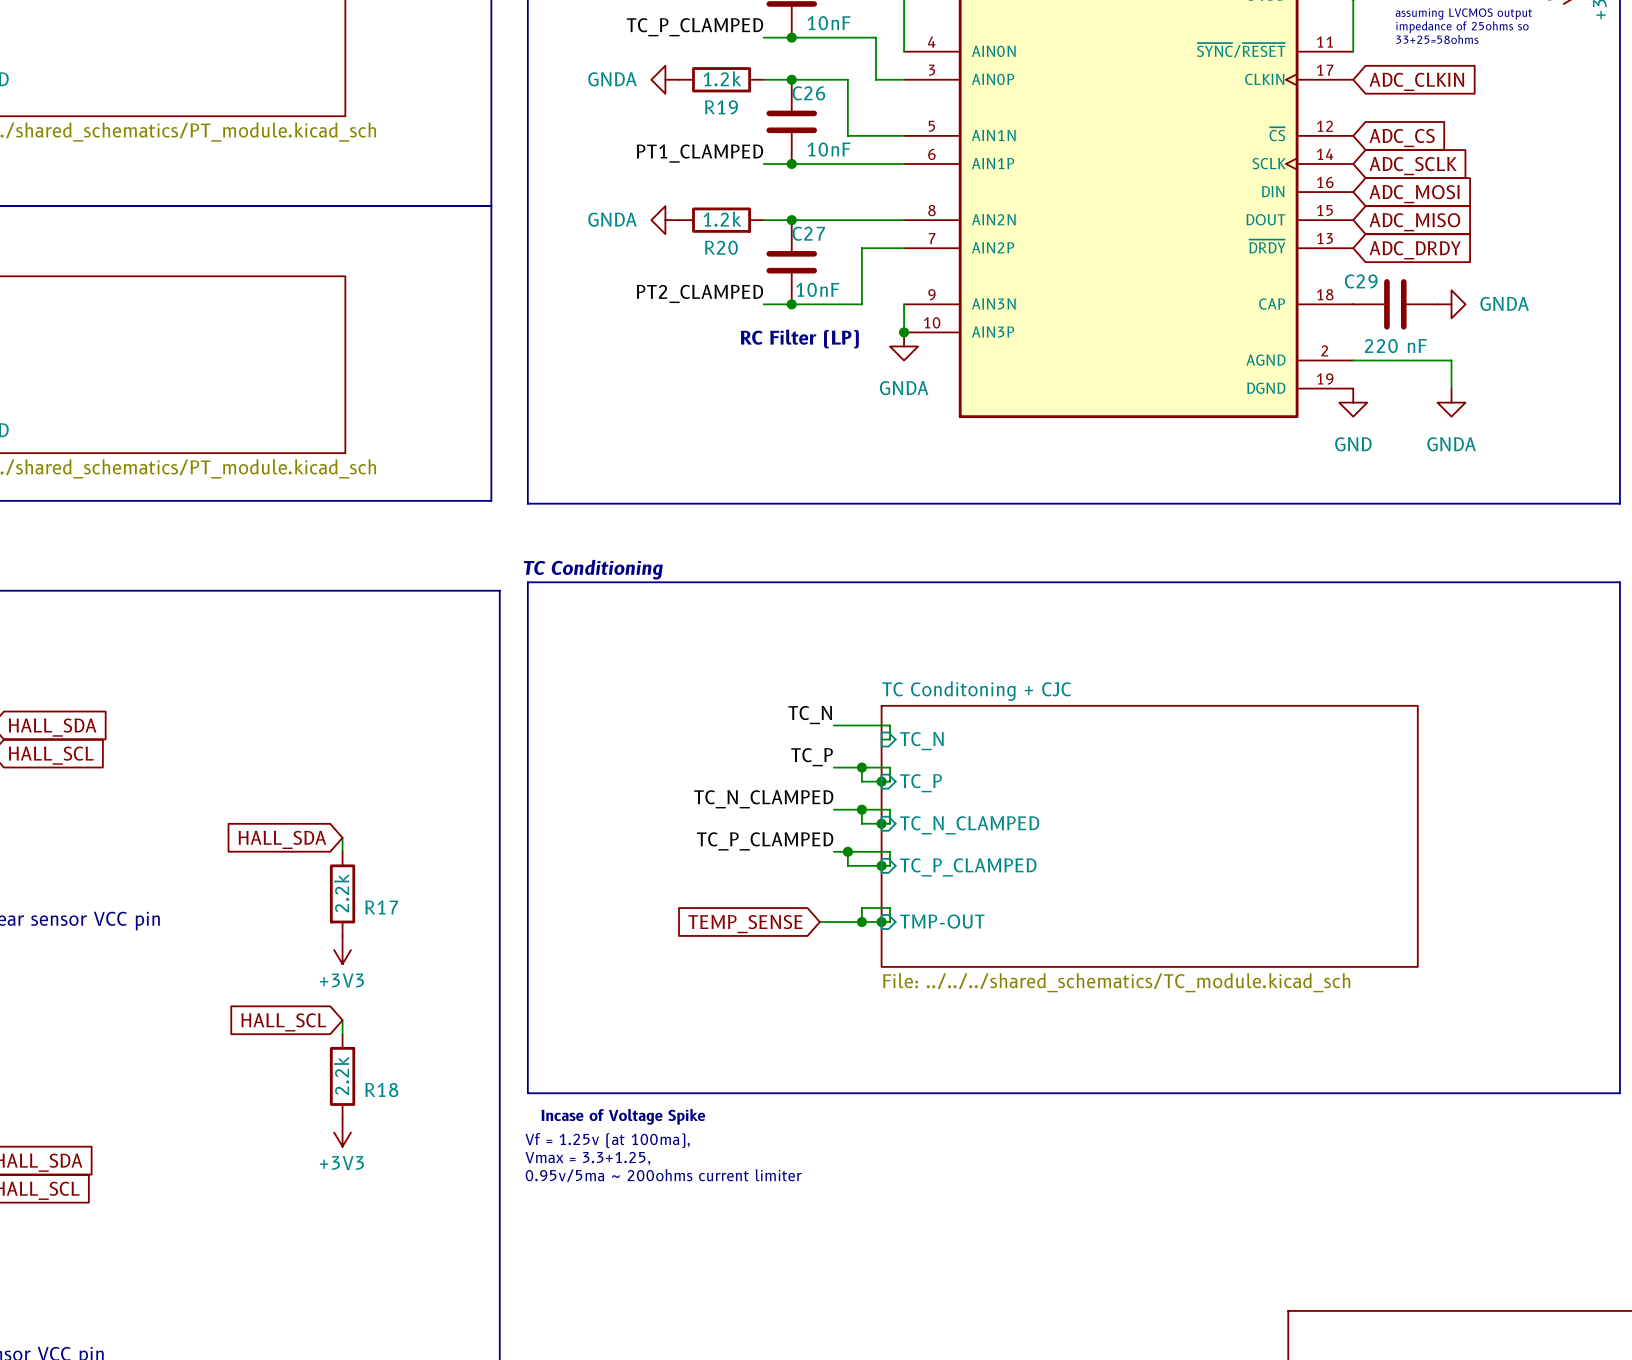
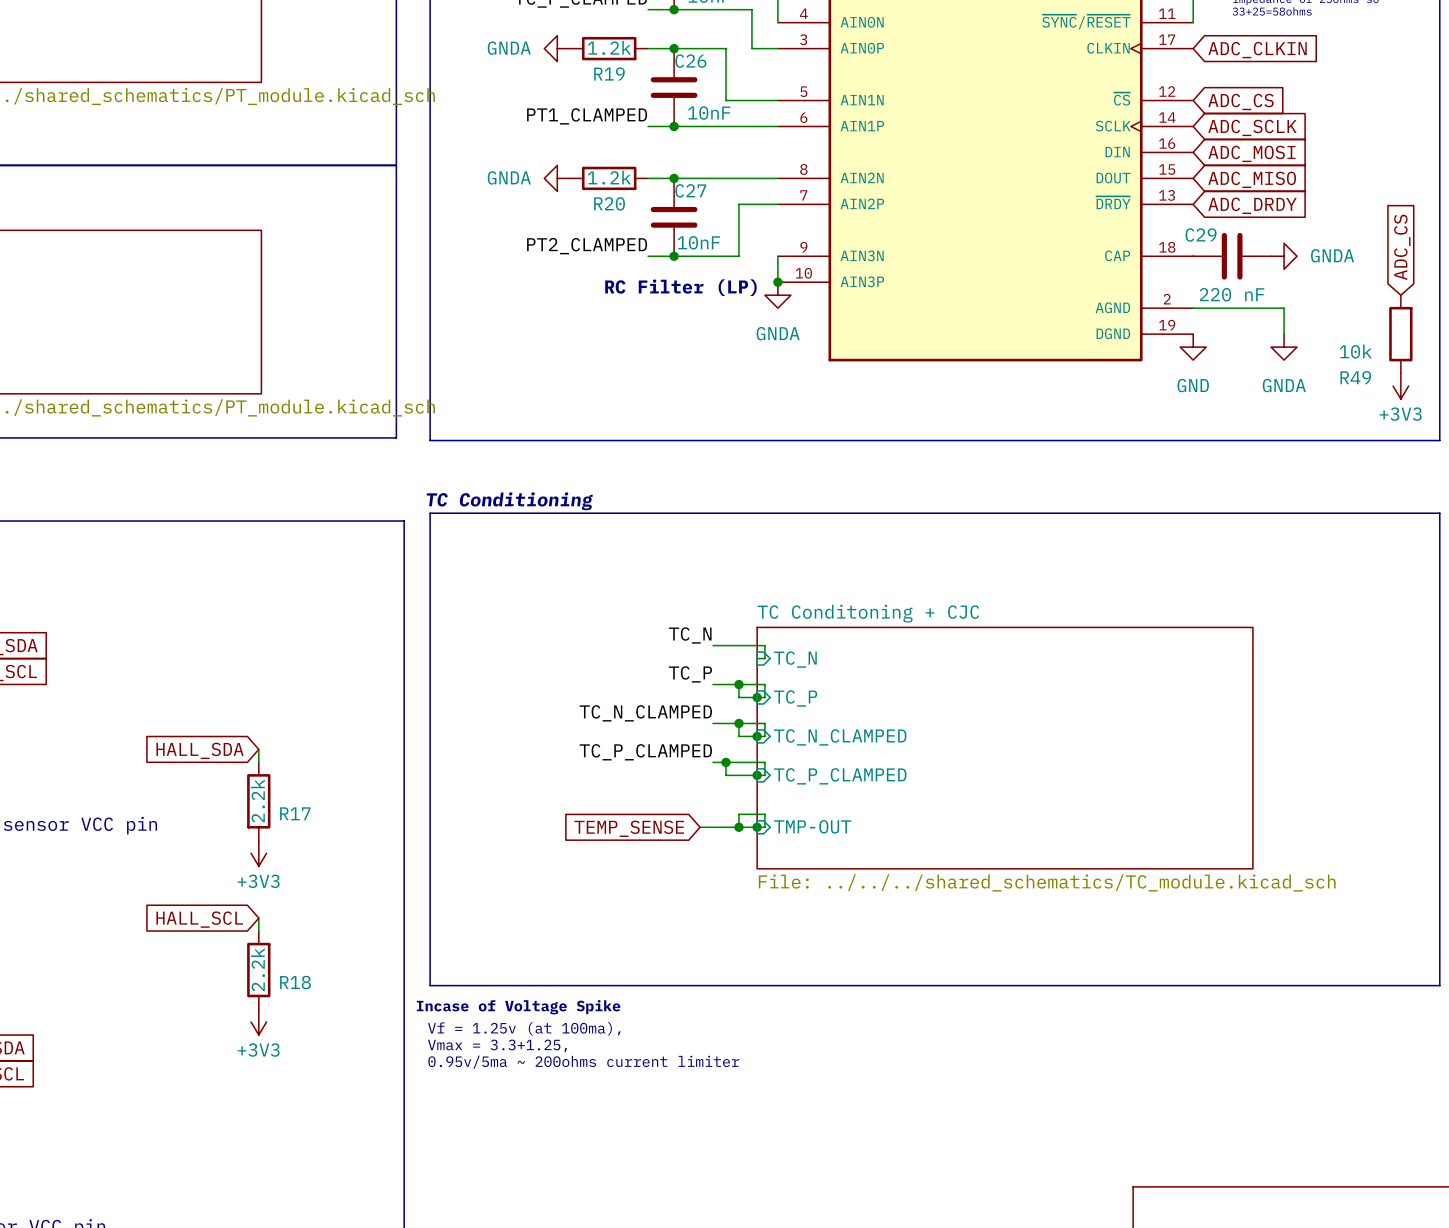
global label: none -> ADC_CS (1402, 247)
R49: none -> 10k (1400, 334)
power symbol: none -> +3V3 (1400, 386)

